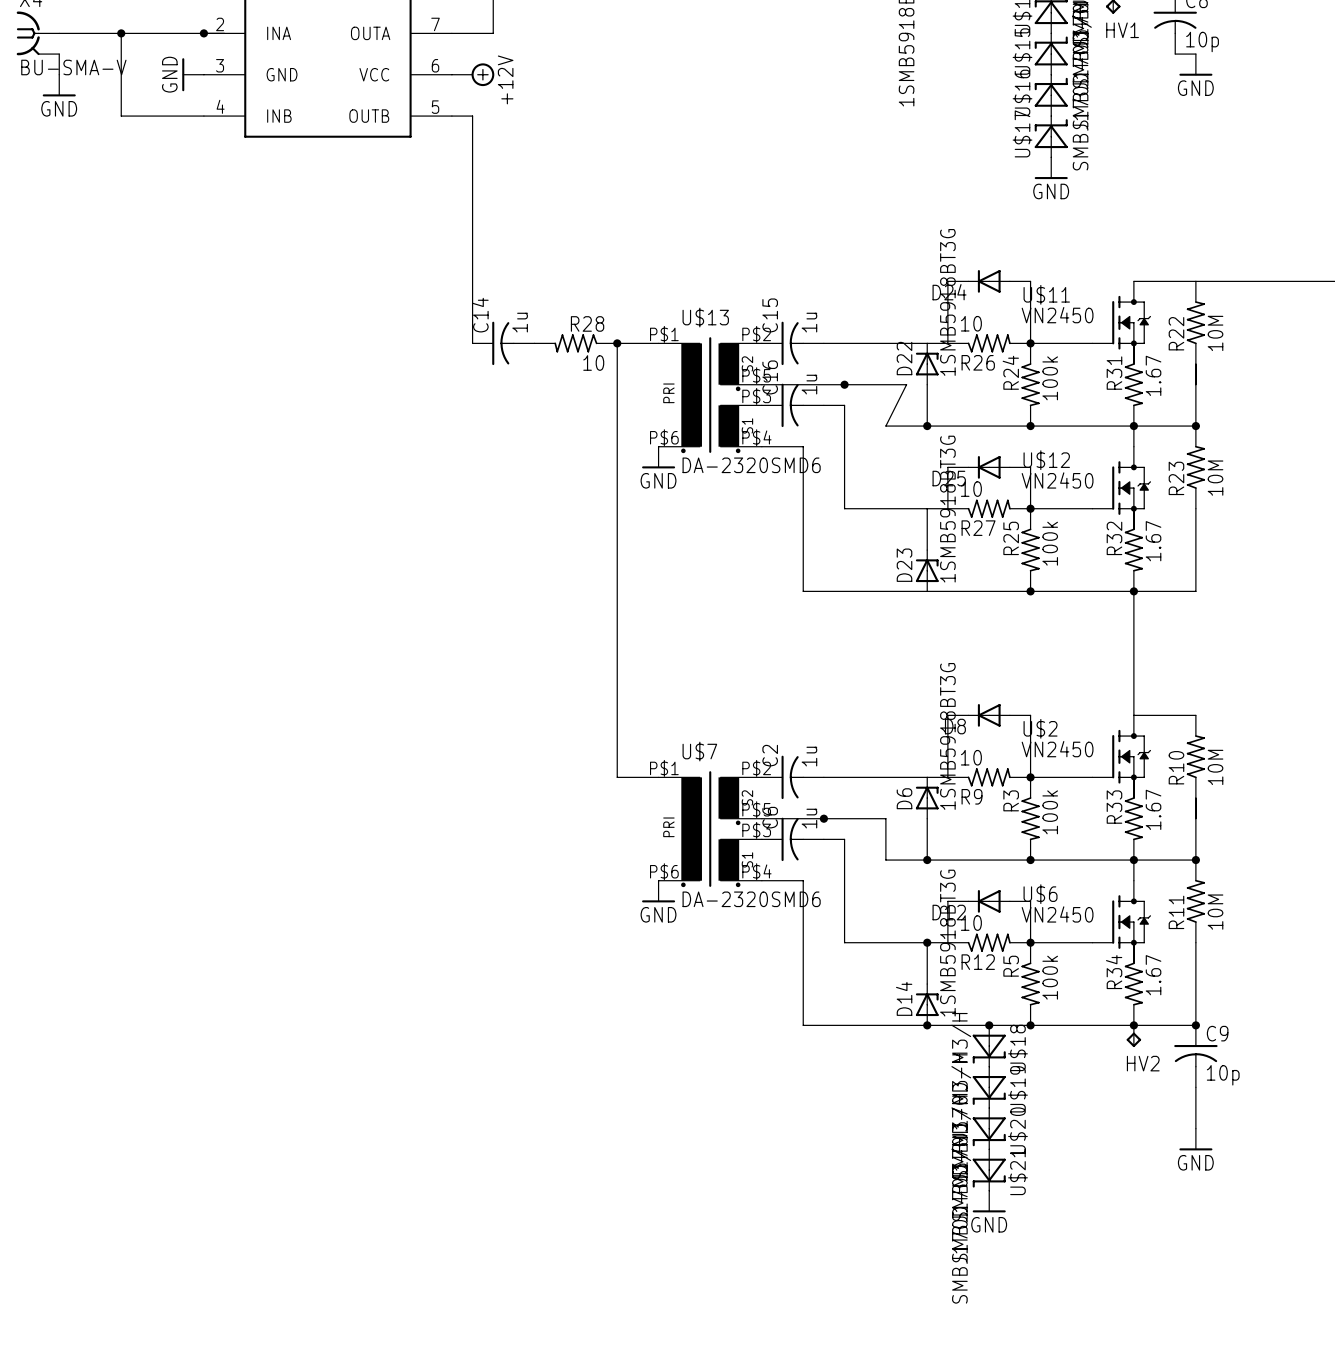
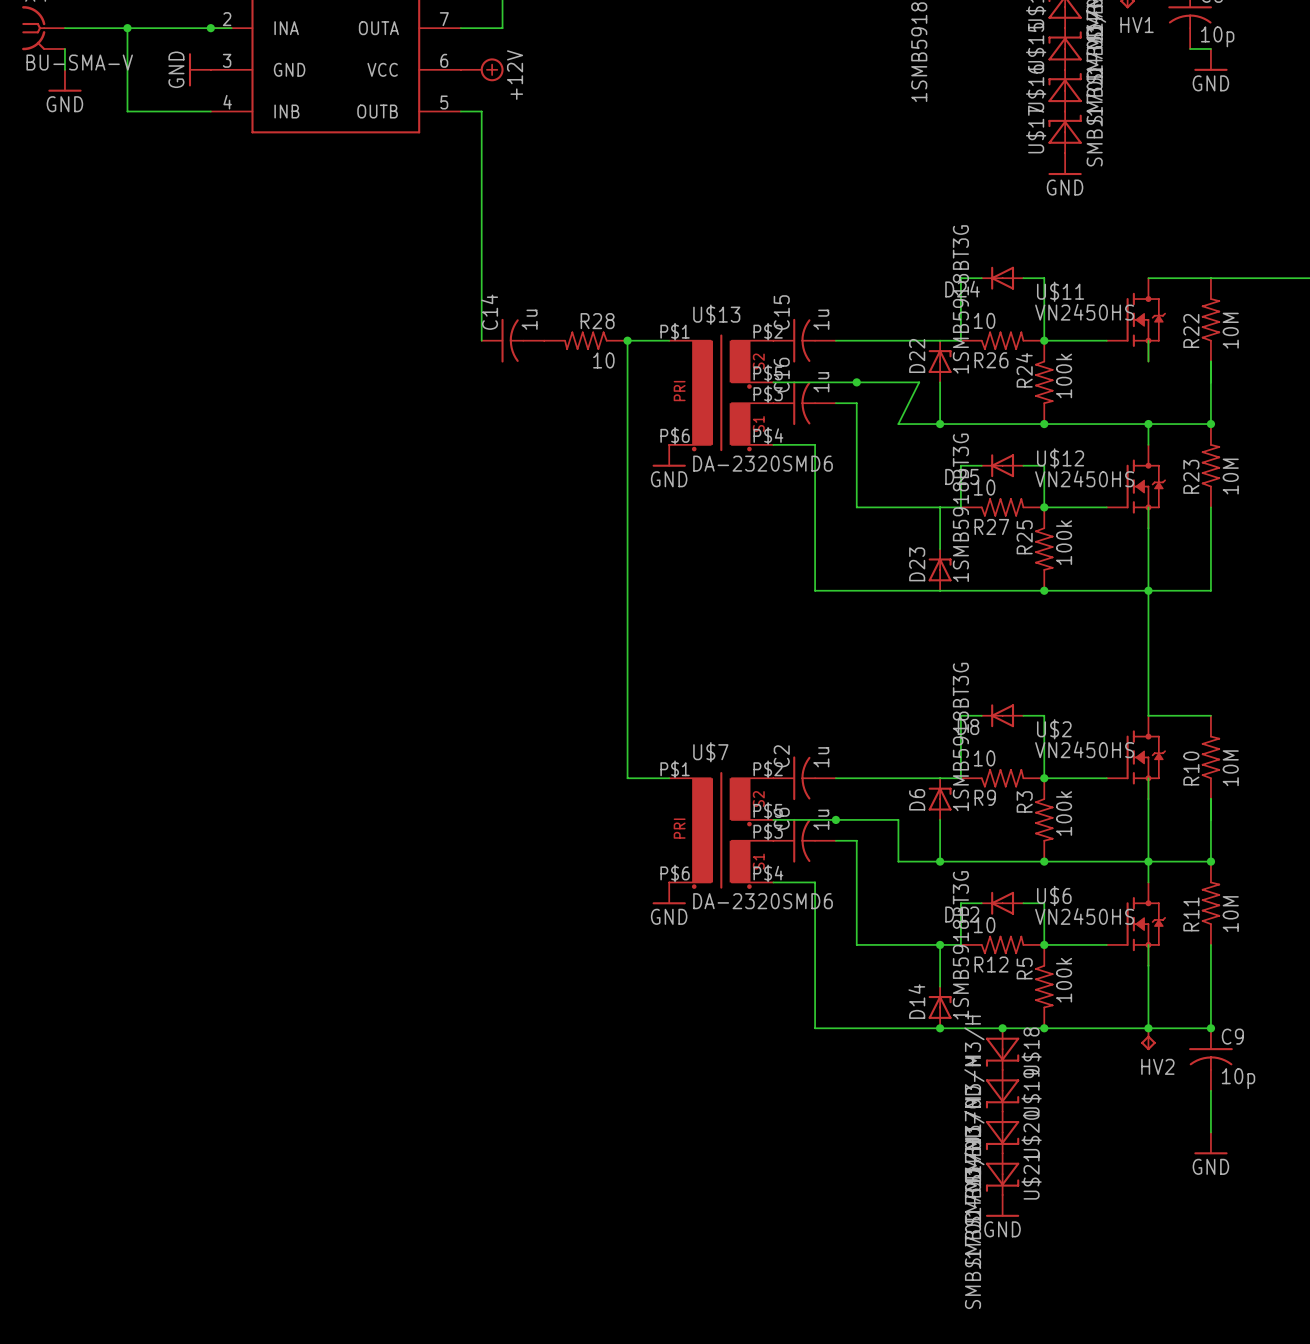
U$11 value: VN2450 (1057, 315) -> VN2450HS (1084, 312)
R31: 1.67 (1133, 384) -> none
U$12 value: VN2450 (1057, 480) -> VN2450HS (1084, 478)
R32: 1.67 (1133, 550) -> none
U$2 value: VN2450 (1057, 749) -> VN2450HS (1084, 749)
R33: 1.67 (1133, 818) -> none
U$6 value: VN2450 (1057, 914) -> VN2450HS (1084, 916)
R34: 1.67 (1133, 984) -> none

